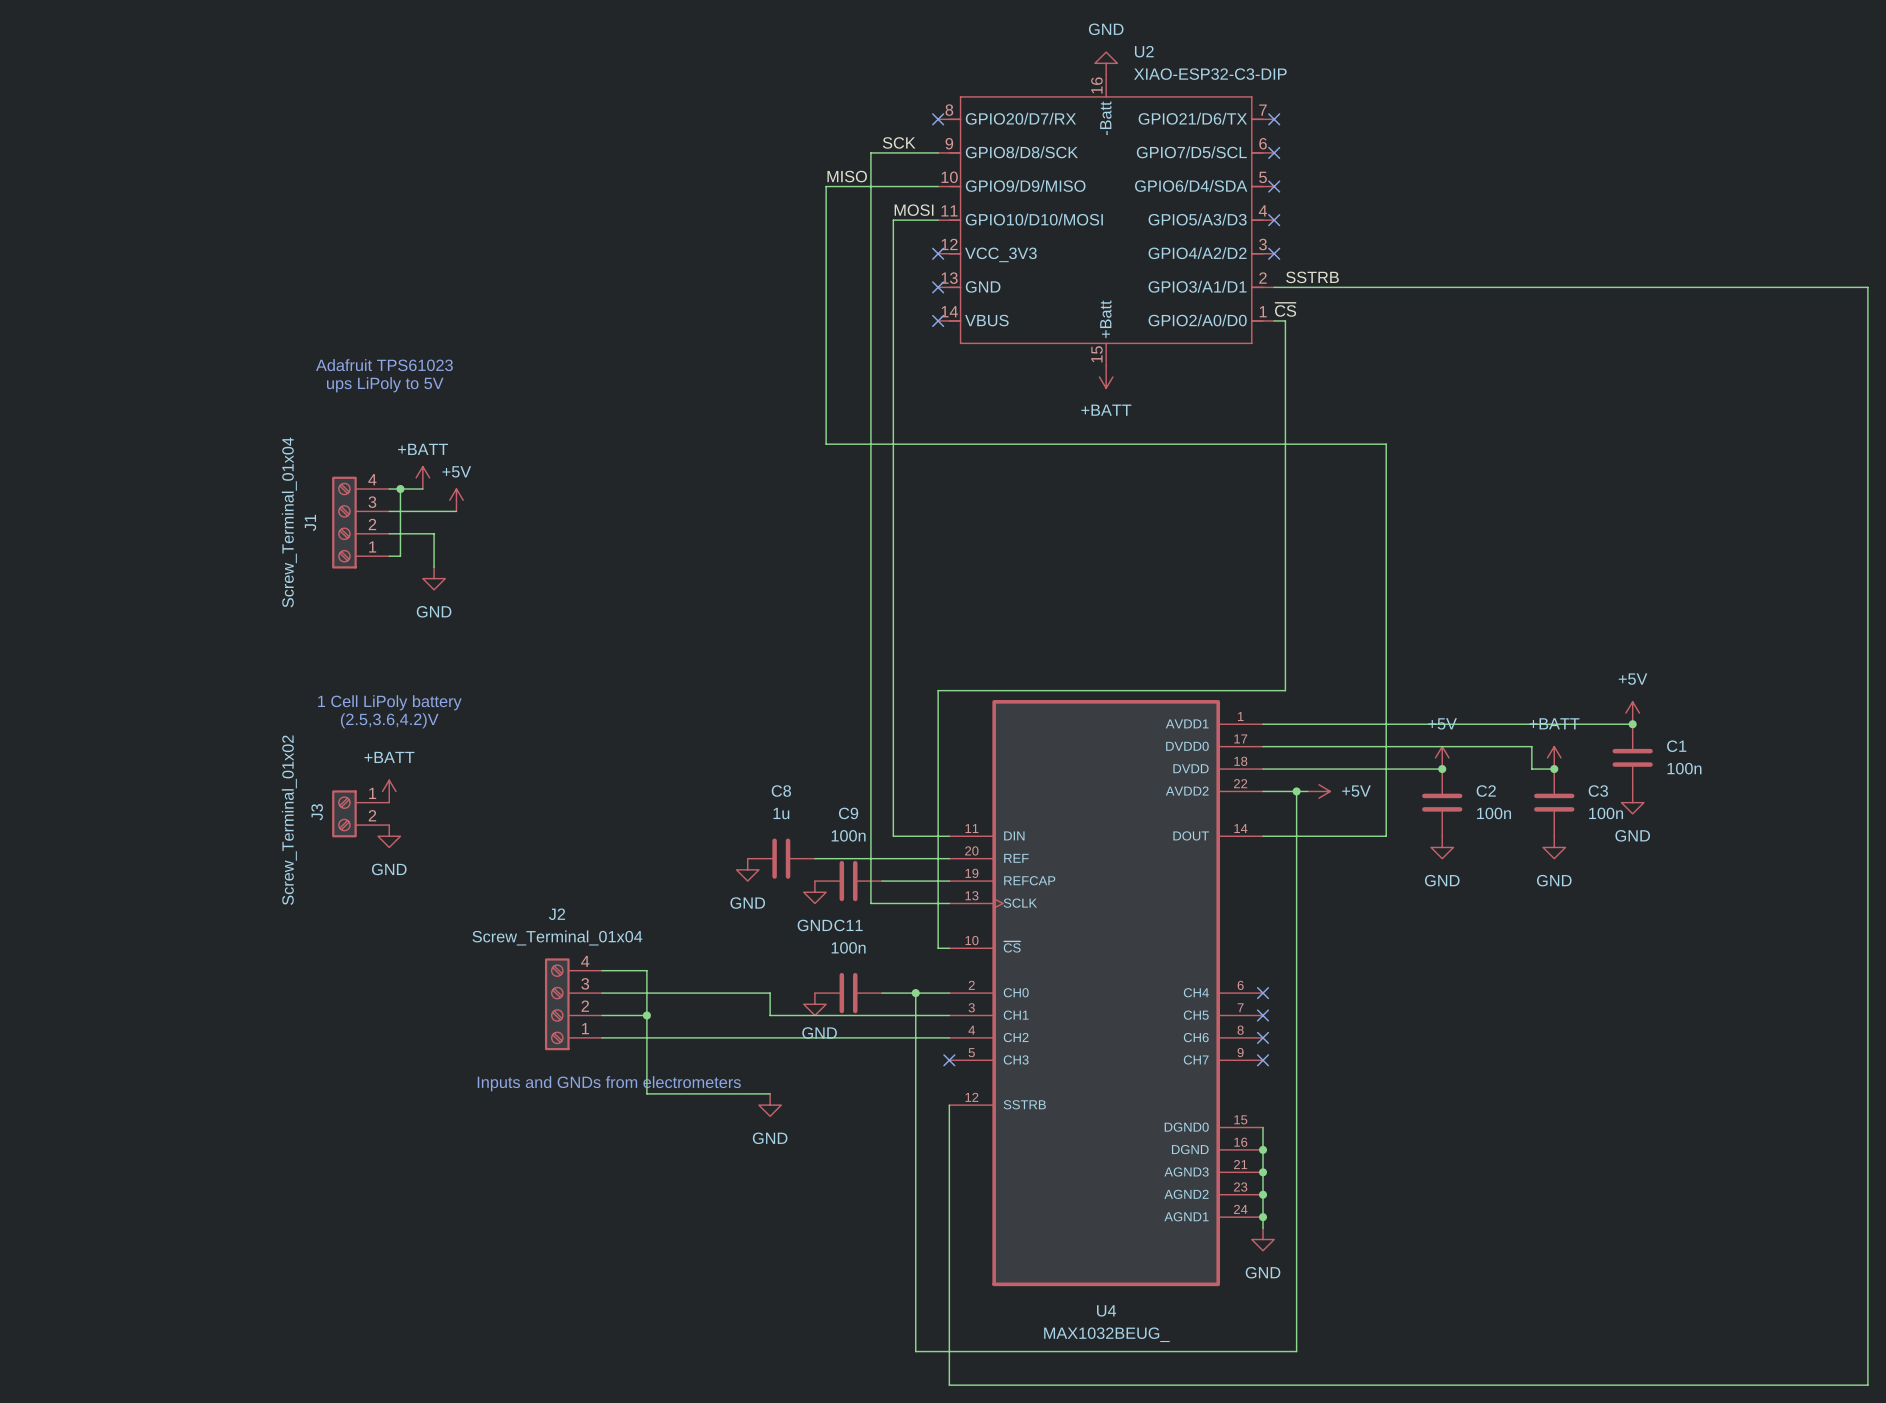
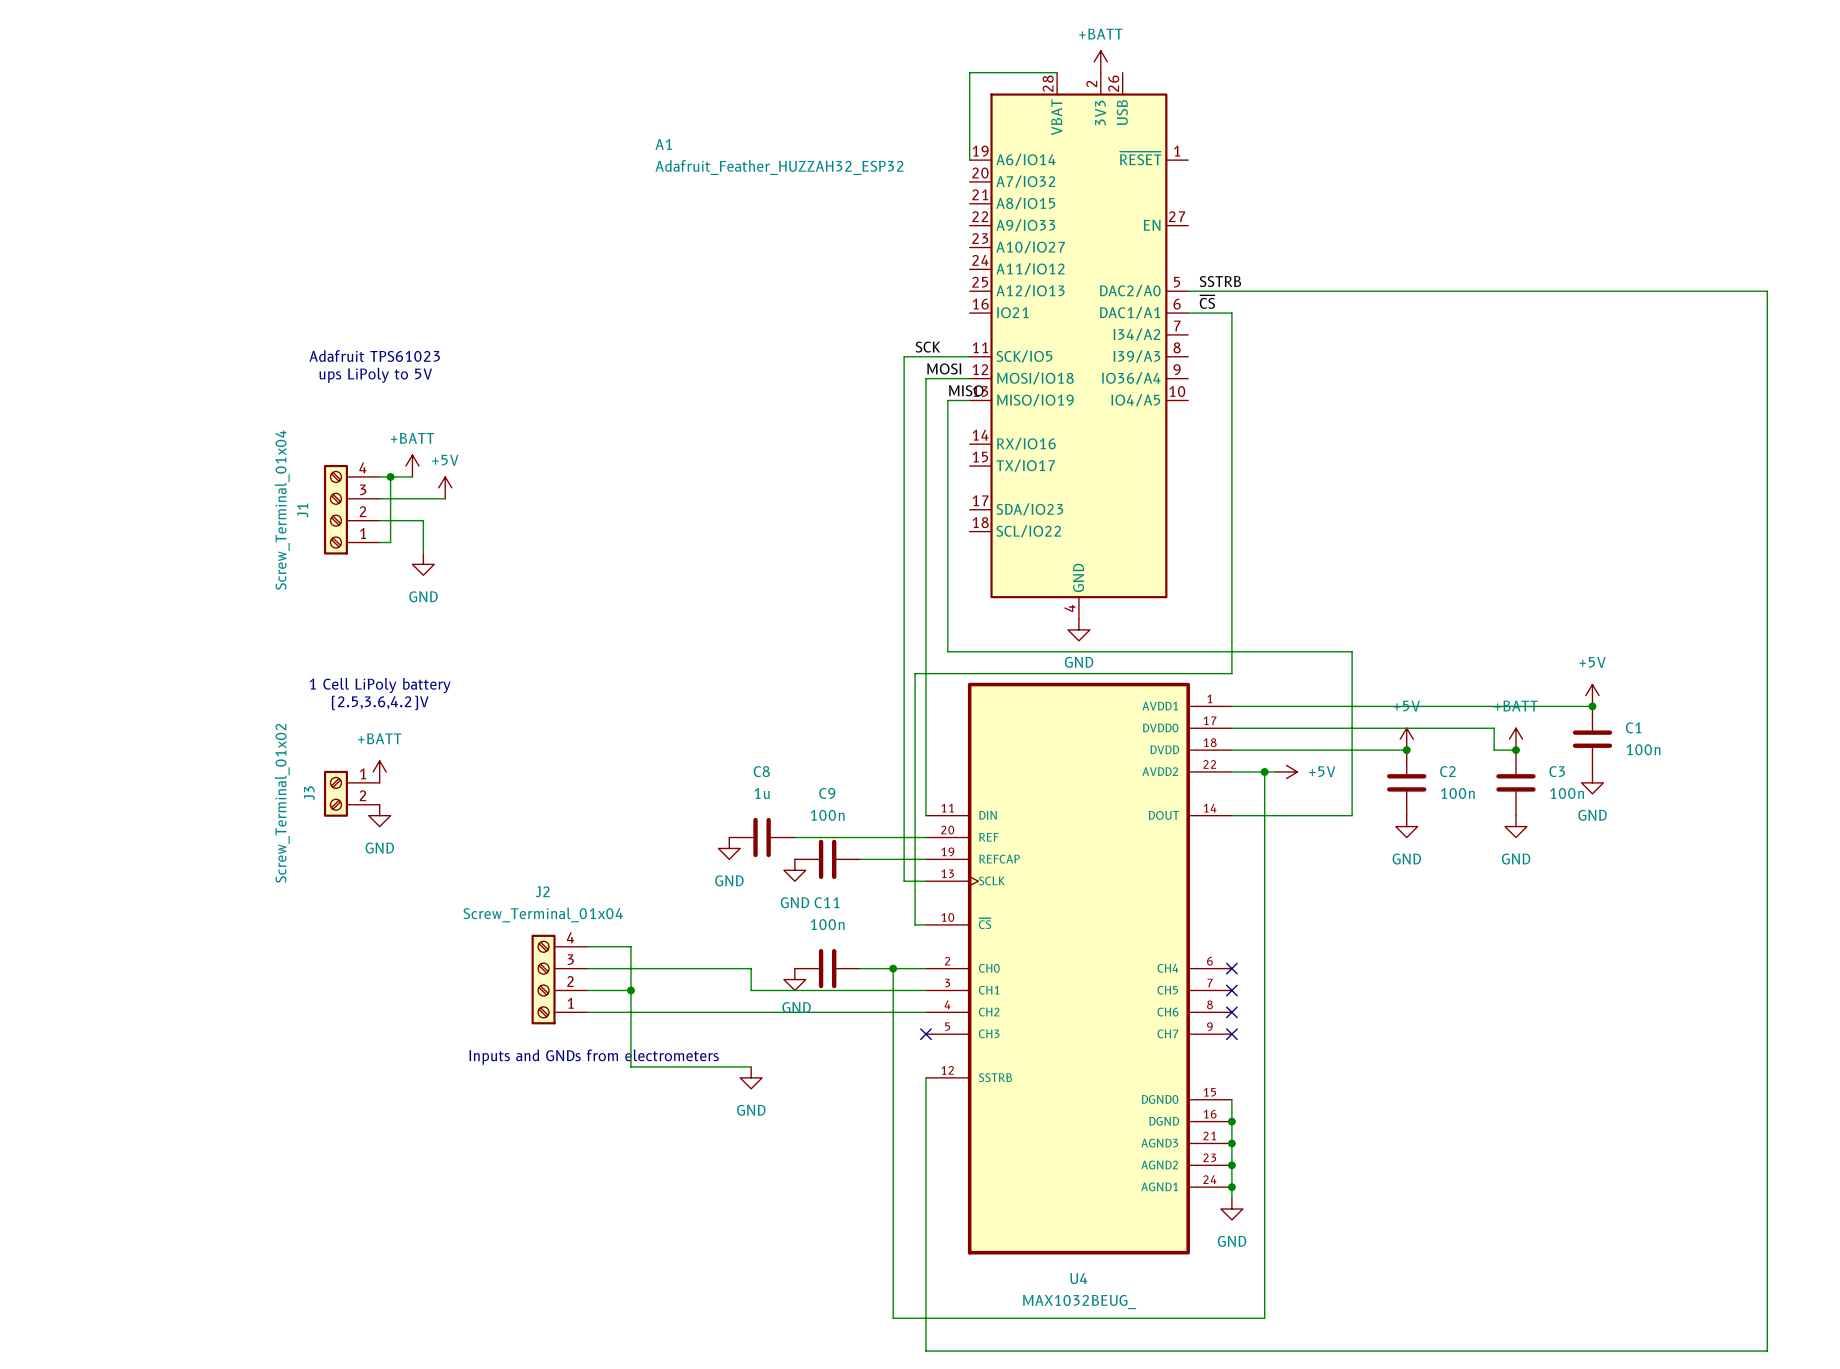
power symbol: GND (1106, 63) -> none
power symbol: none -> +BATT (1100, 61)
wire: none -> (1057, 72) (969, 72) (969, 160)
no-connect mark: (938, 119) -> none
no-connect mark: (1274, 119) -> none
label position: SCK (899, 142) -> SCK (927, 347)
wire: (938, 152) (870, 152) (870, 903) (926, 903) -> (969, 356) (904, 356) (904, 881)
no-connect mark: (1274, 152) -> none
label: MISO (847, 176) -> none
wire: (938, 186) (826, 186) (826, 444) (1386, 444) (1386, 668) -> (969, 400) (947, 400) (947, 651) (1352, 651)
no-connect mark: (1274, 186) -> none
label position: MOSI (914, 210) -> MOSI (944, 368)
wire: (938, 220) (893, 220) (893, 836) (949, 836) -> (969, 378) (925, 378) (925, 815)
U2: XIAO-ESP32-C3-DIP (1106, 220) -> none
no-connect mark: (1274, 220) -> none
no-connect mark: (938, 253) -> none
no-connect mark: (1274, 253) -> none
label position: SSTRB (1312, 277) -> SSTRB (1220, 281)
no-connect mark: (938, 287) -> none
wire: (1274, 287) (1867, 287) (1867, 1385) (1811, 1385) -> (1188, 291) (1767, 291) (1767, 1351)
label position: ~{CS} (1285, 309) -> ~{CS} (1207, 302)
no-connect mark: (938, 320) -> none
wire: (1274, 320) (1285, 320) (1285, 690) (1263, 690) -> (1188, 313) (1231, 313) (1231, 673)
A1: none -> Adafruit_Feather_HUZZAH32_ESP32 (1078, 345)
power symbol: +BATT (1106, 376) -> none
label: none -> MISO (966, 390)
power symbol: none -> GND (1078, 629)

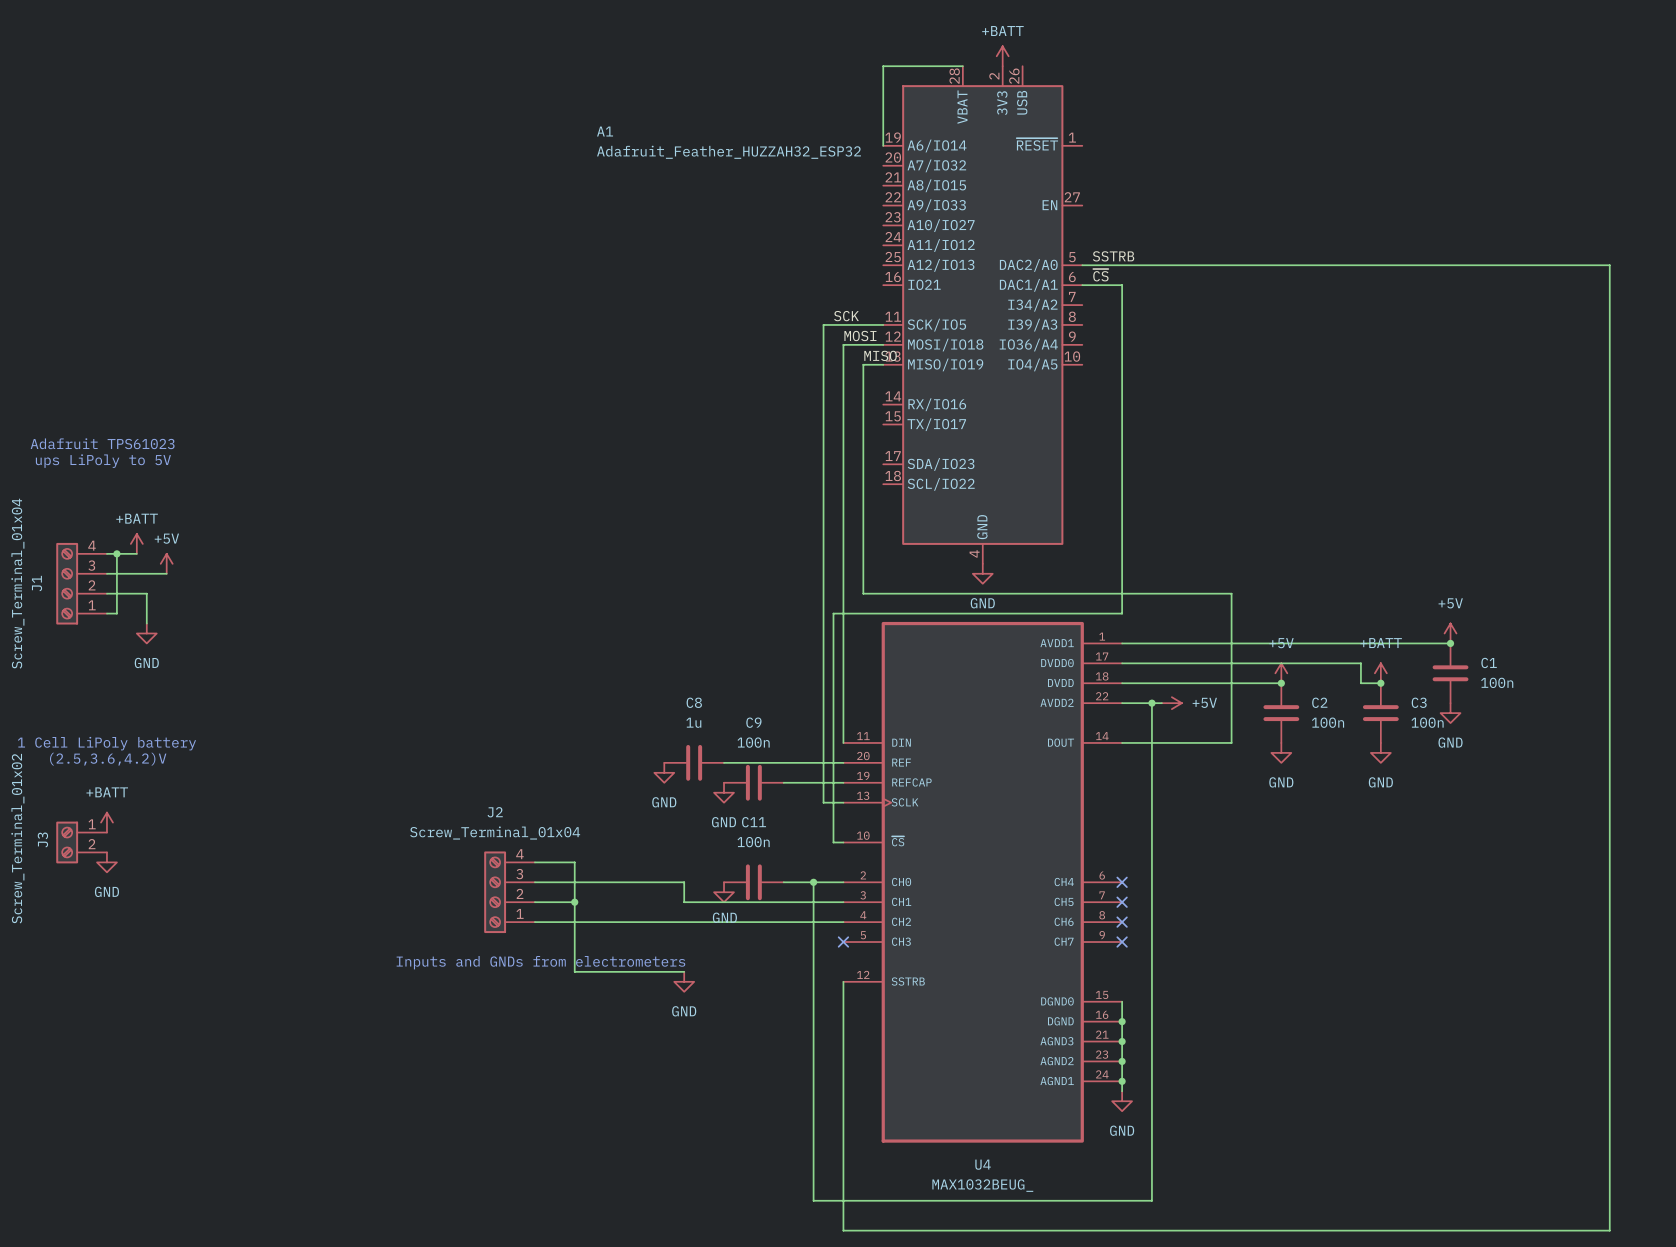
text: Adafruit TPS61023 (374, 356) -> none
text: ups LiPoly to 5V (375, 375) -> none
power symbol: +BATT (412, 466) -> none
wire: (379, 476) (412, 476) -> none
wire: (390, 476) (390, 542) (379, 542) -> none
junction: (390, 476) -> none
text: none -> Adafruit TPS61023 (102, 443)
power symbol: +5V (445, 487) -> none
wire: (379, 498) (445, 498) -> none
text: none -> ups LiPoly to 5V (103, 461)
J1 position: (351, 509) -> (81, 583)
wire: (379, 520) (423, 520) (423, 553) -> none
power symbol: GND (423, 564) -> none
power symbol: none -> +BATT (136, 543)
wire: none -> (106, 553) (136, 553)
wire: none -> (116, 553) (116, 613) (106, 613)
junction: none -> (116, 553)
power symbol: none -> +5V (166, 563)
wire: none -> (106, 573) (166, 573)
wire: none -> (106, 593) (146, 593) (146, 623)
text: 1 Cell LiPoly battery (380, 685) -> none
power symbol: none -> GND (146, 633)
text: (2.5,3.6,4.2)V (380, 702) -> none
power symbol: +BATT (379, 771) -> none
J3 position: (351, 793) -> (81, 842)
power symbol: GND (379, 815) -> none
text: none -> 1 Cell LiPoly battery (106, 743)
text: none -> (2.5,3.6,4.2)V (108, 759)
power symbol: none -> +BATT (106, 822)
power symbol: none -> GND (106, 862)

